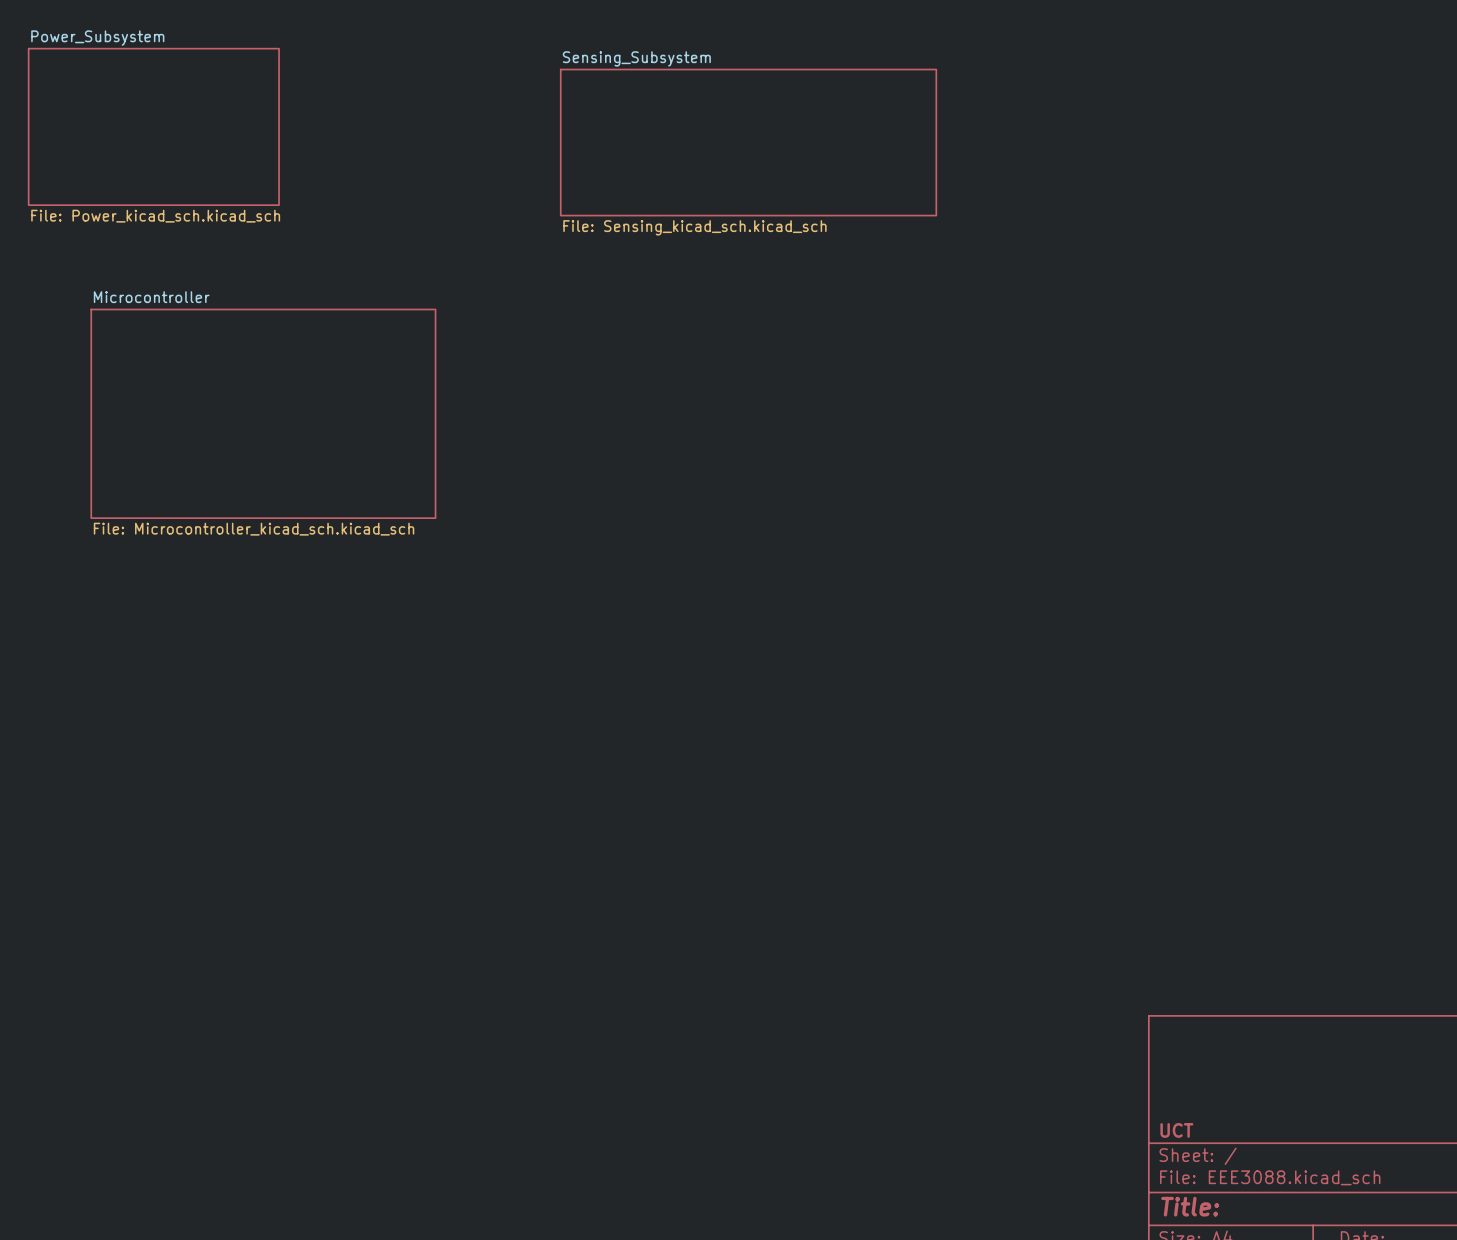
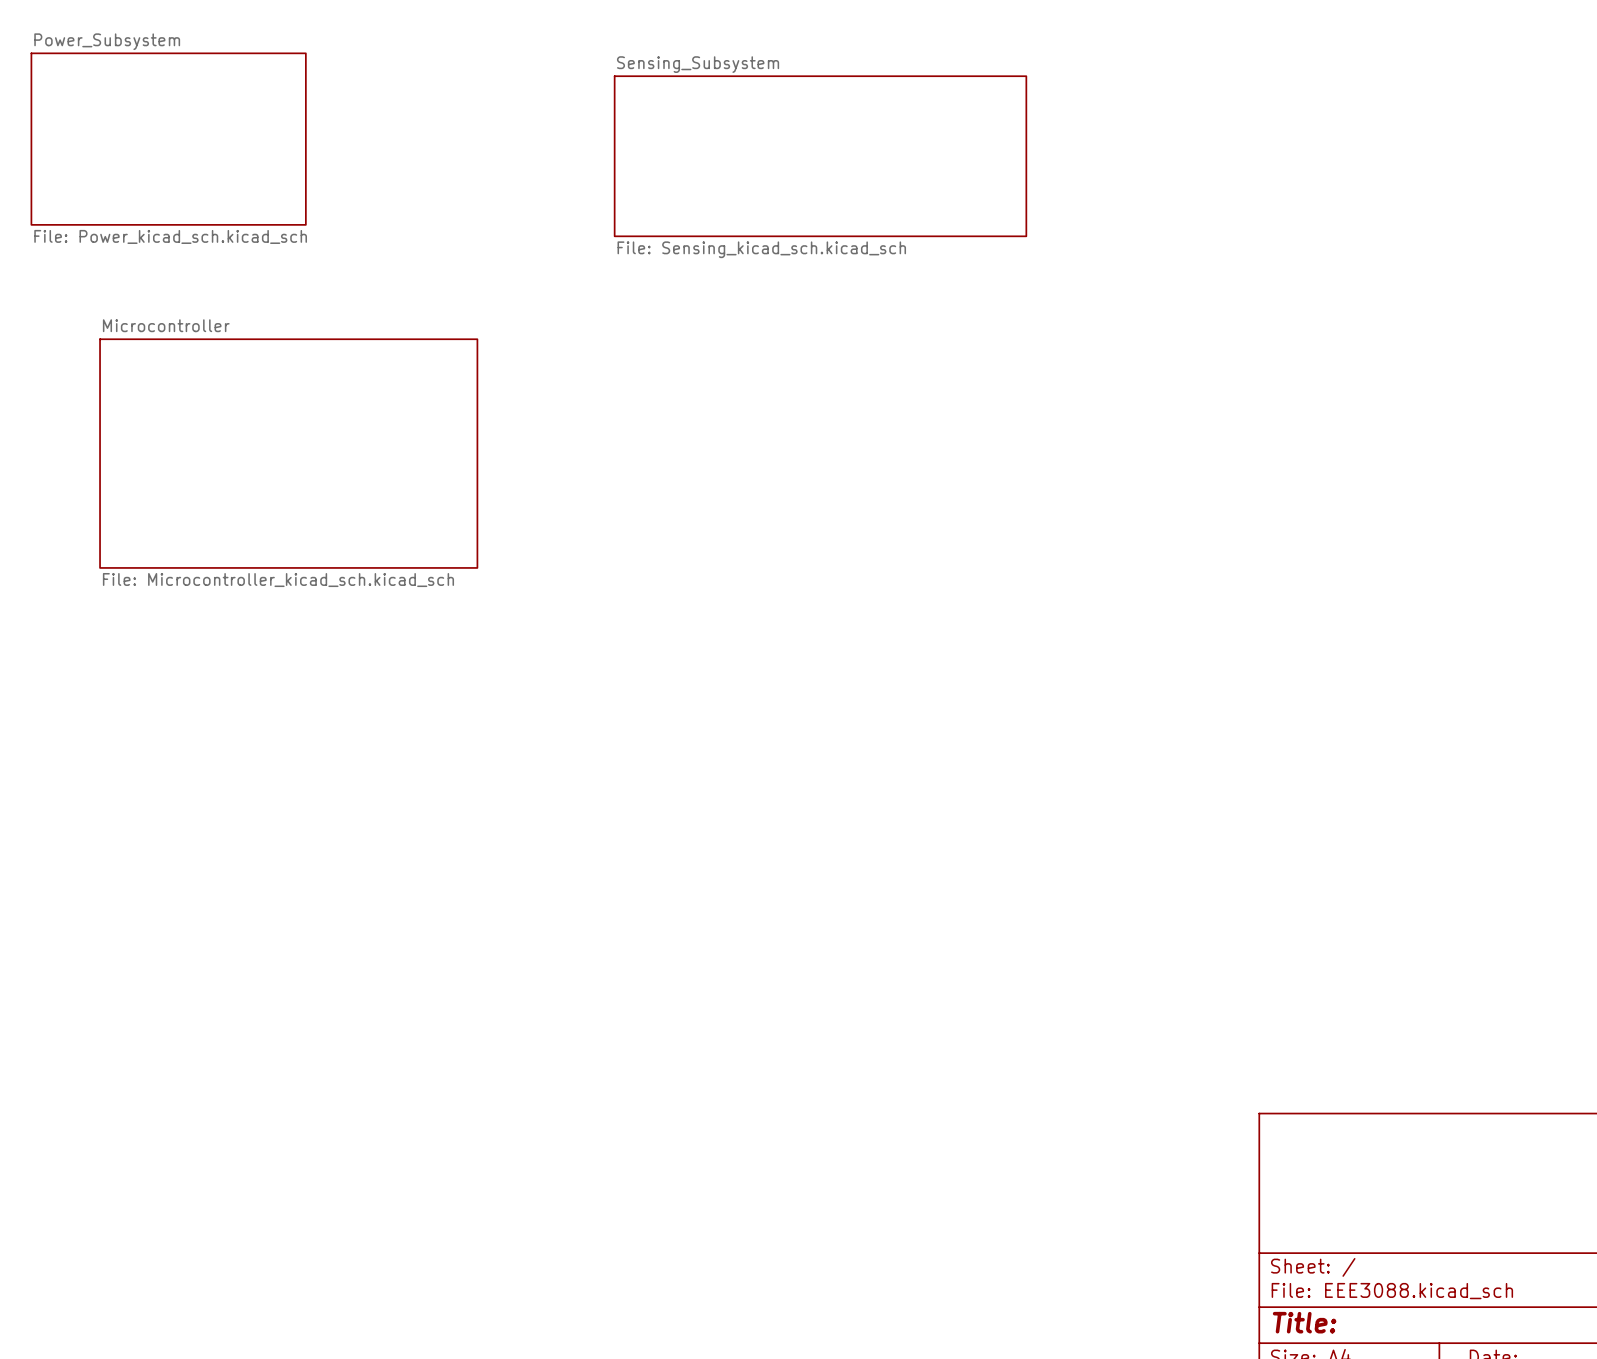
title block: UCT (1176, 1130) -> none

